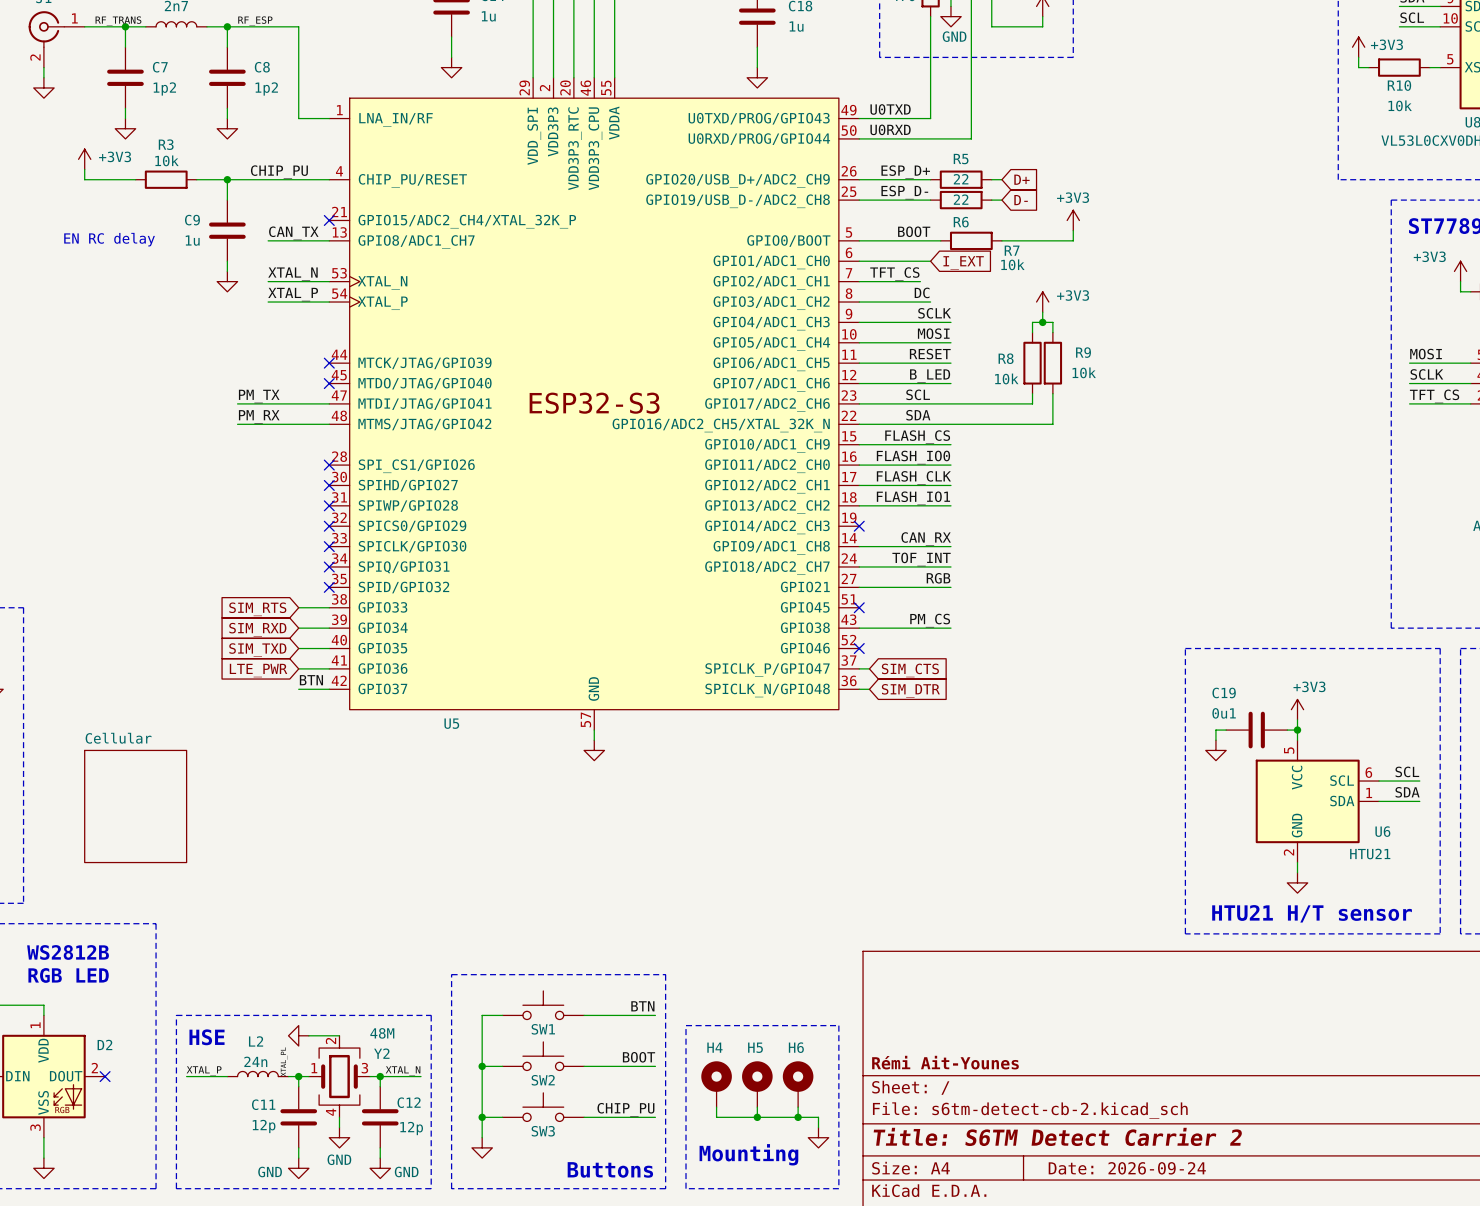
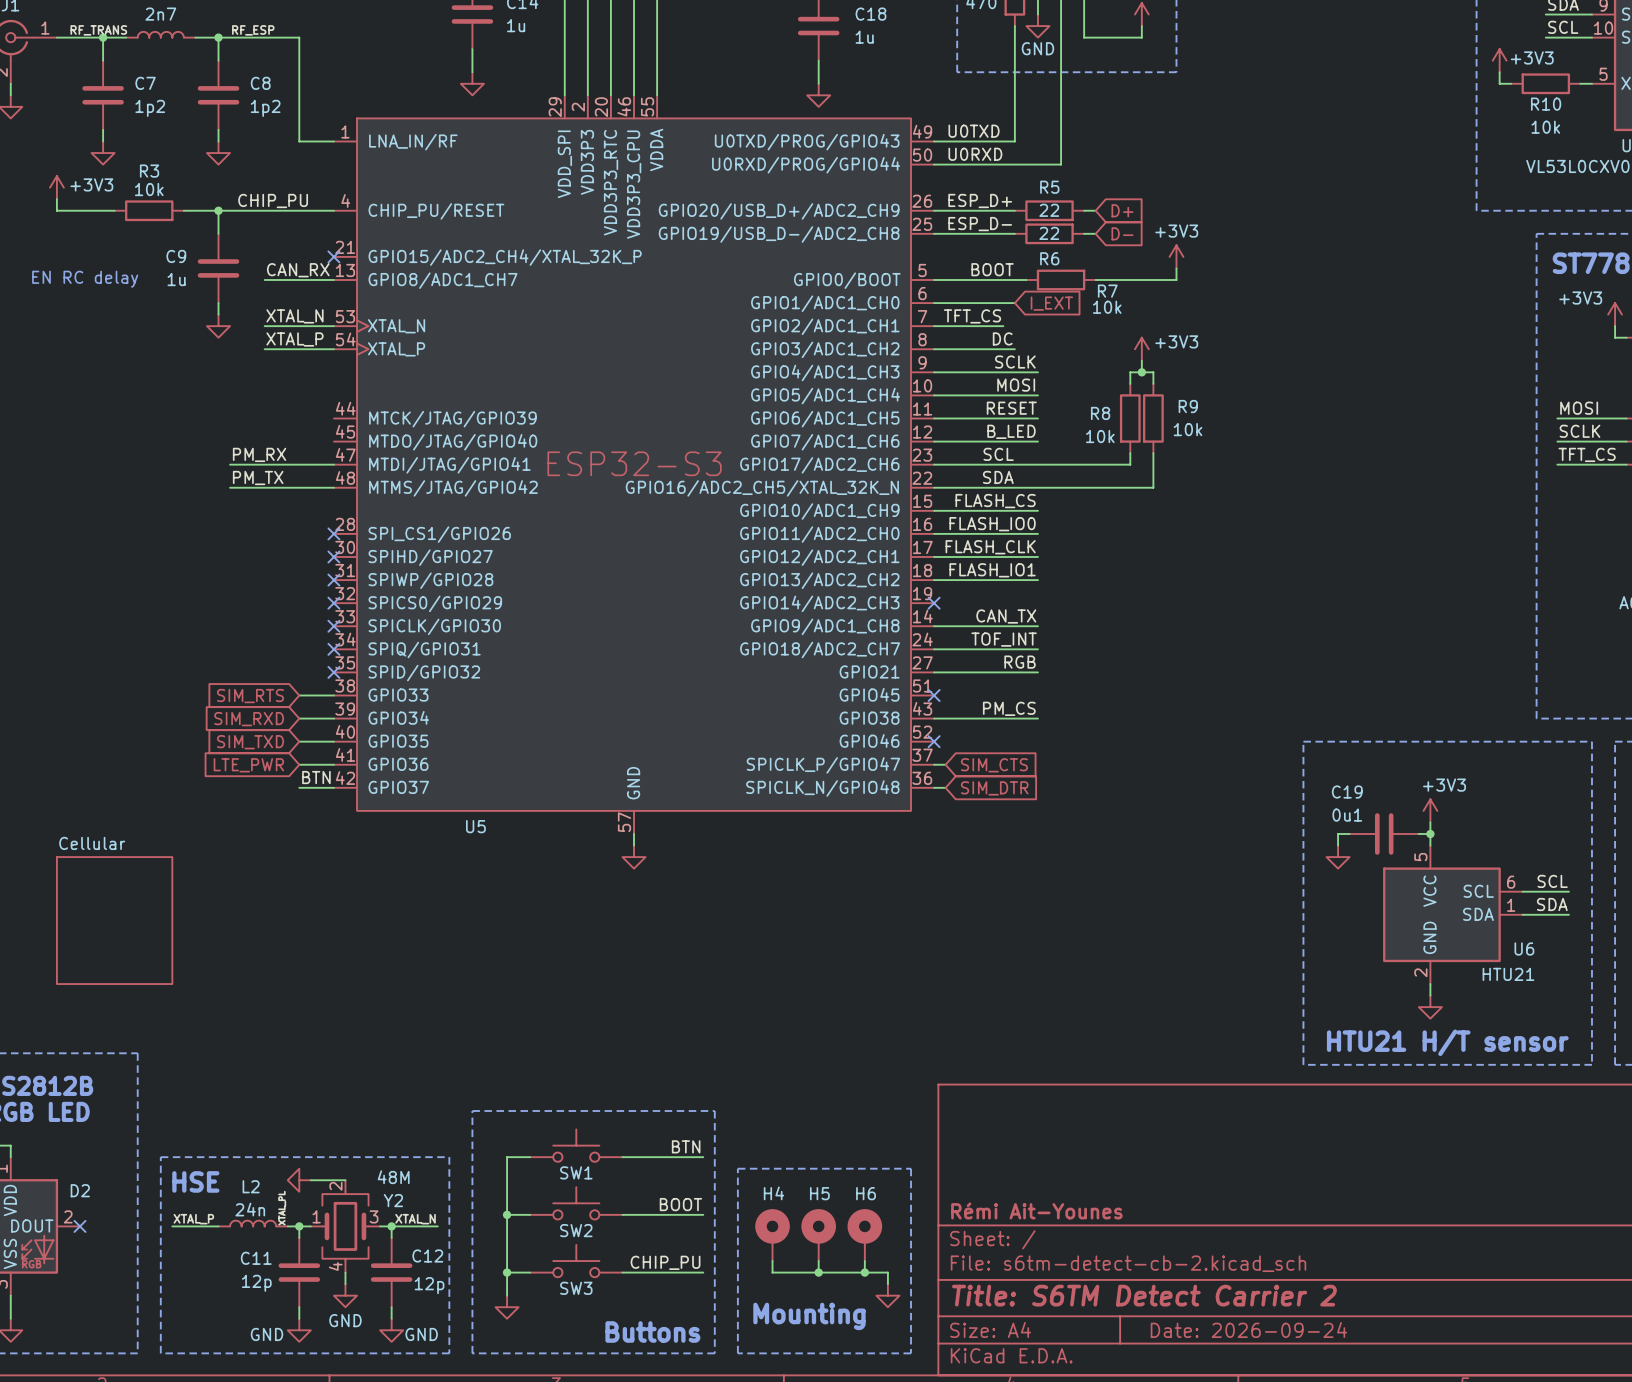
label: CAN_TX (293, 233) -> CAN_RX (298, 270)
no-connect mark: (329, 363) -> none
no-connect mark: (329, 383) -> none
label: PM_TX (259, 396) -> PM_RX (259, 454)
label: PM_RX (259, 416) -> PM_TX (258, 477)
label: CAN_RX (926, 539) -> CAN_TX (1006, 616)

